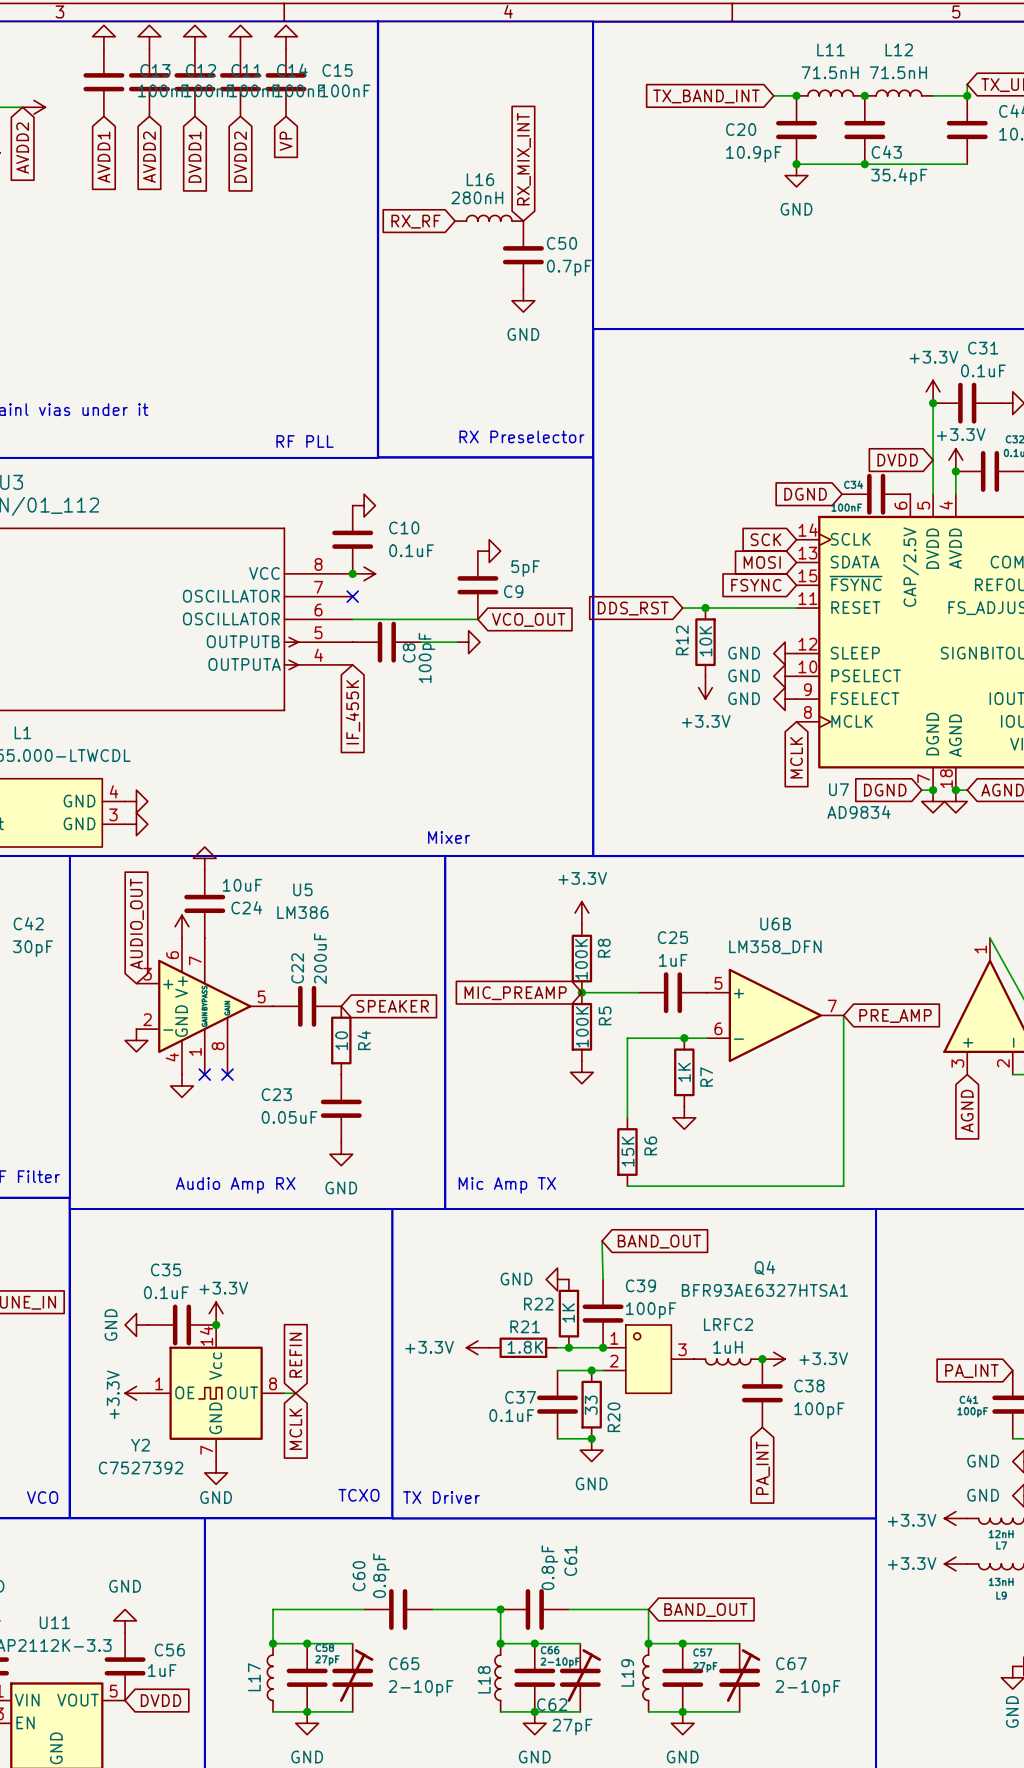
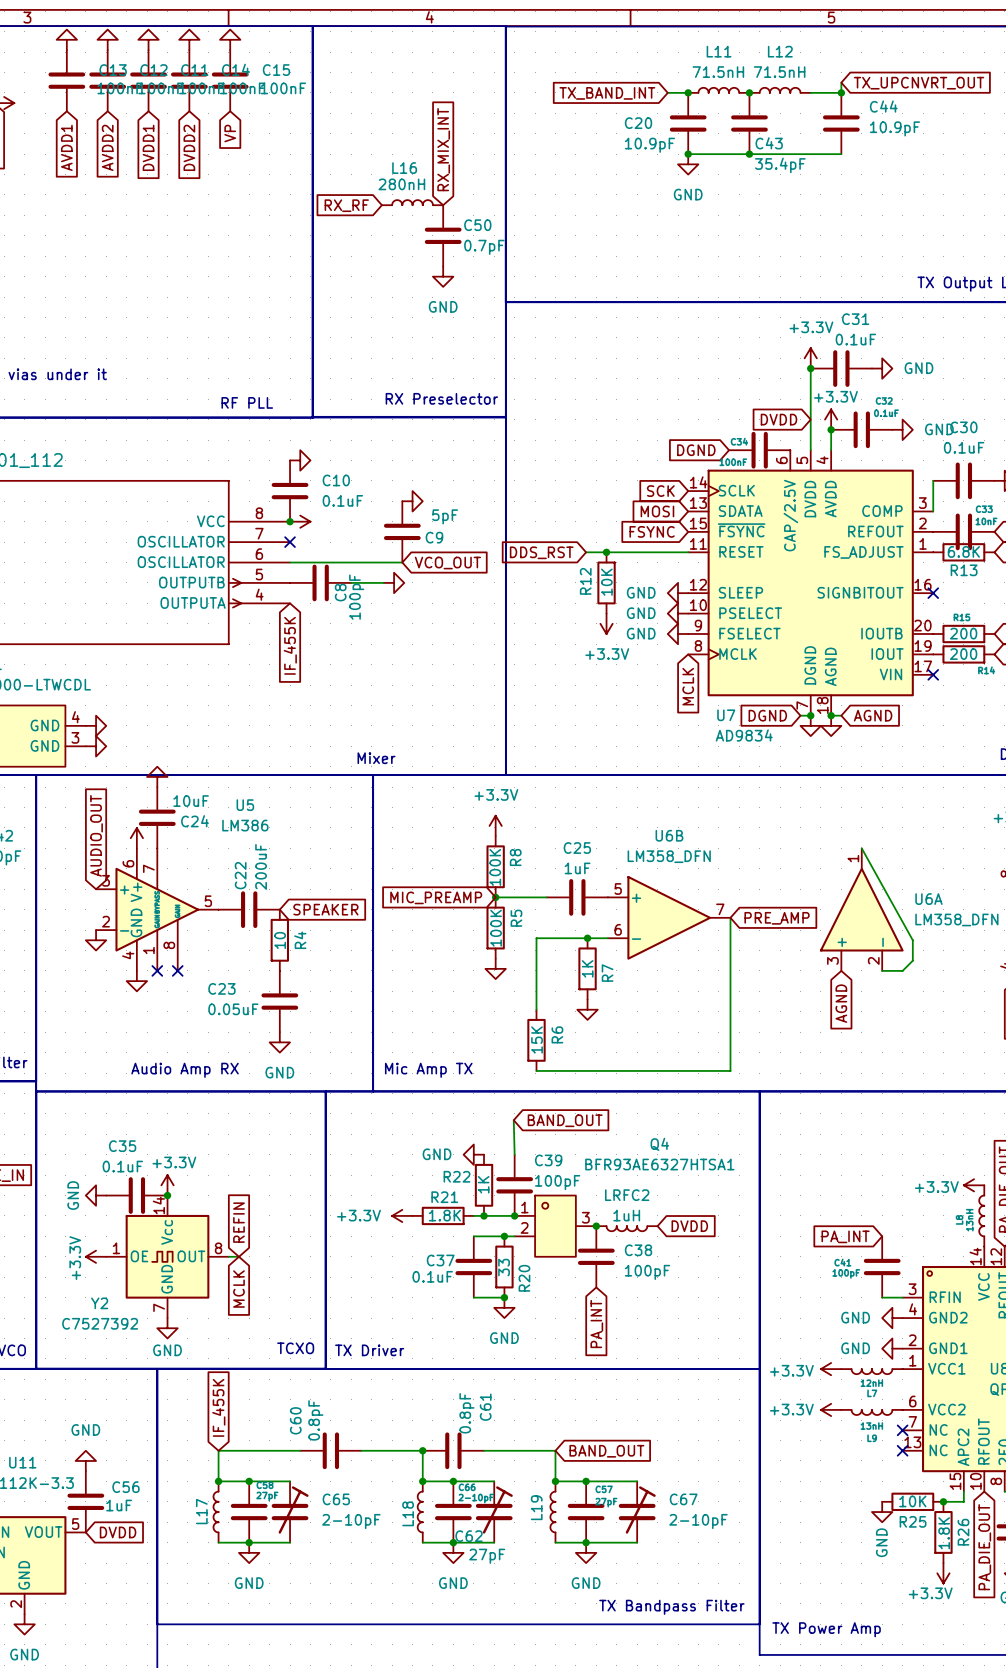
junction: none -> (596, 1226)
junction: (762, 1359) -> none
power symbol: +3.3V (773, 1359) -> none
global label: none -> DVDD (689, 1226)
C38 position: (762, 1393) -> (596, 1256)
global label position: PA_INT (762, 1468) -> PA_INT (596, 1324)
global label: none -> IF_455K (218, 1407)

